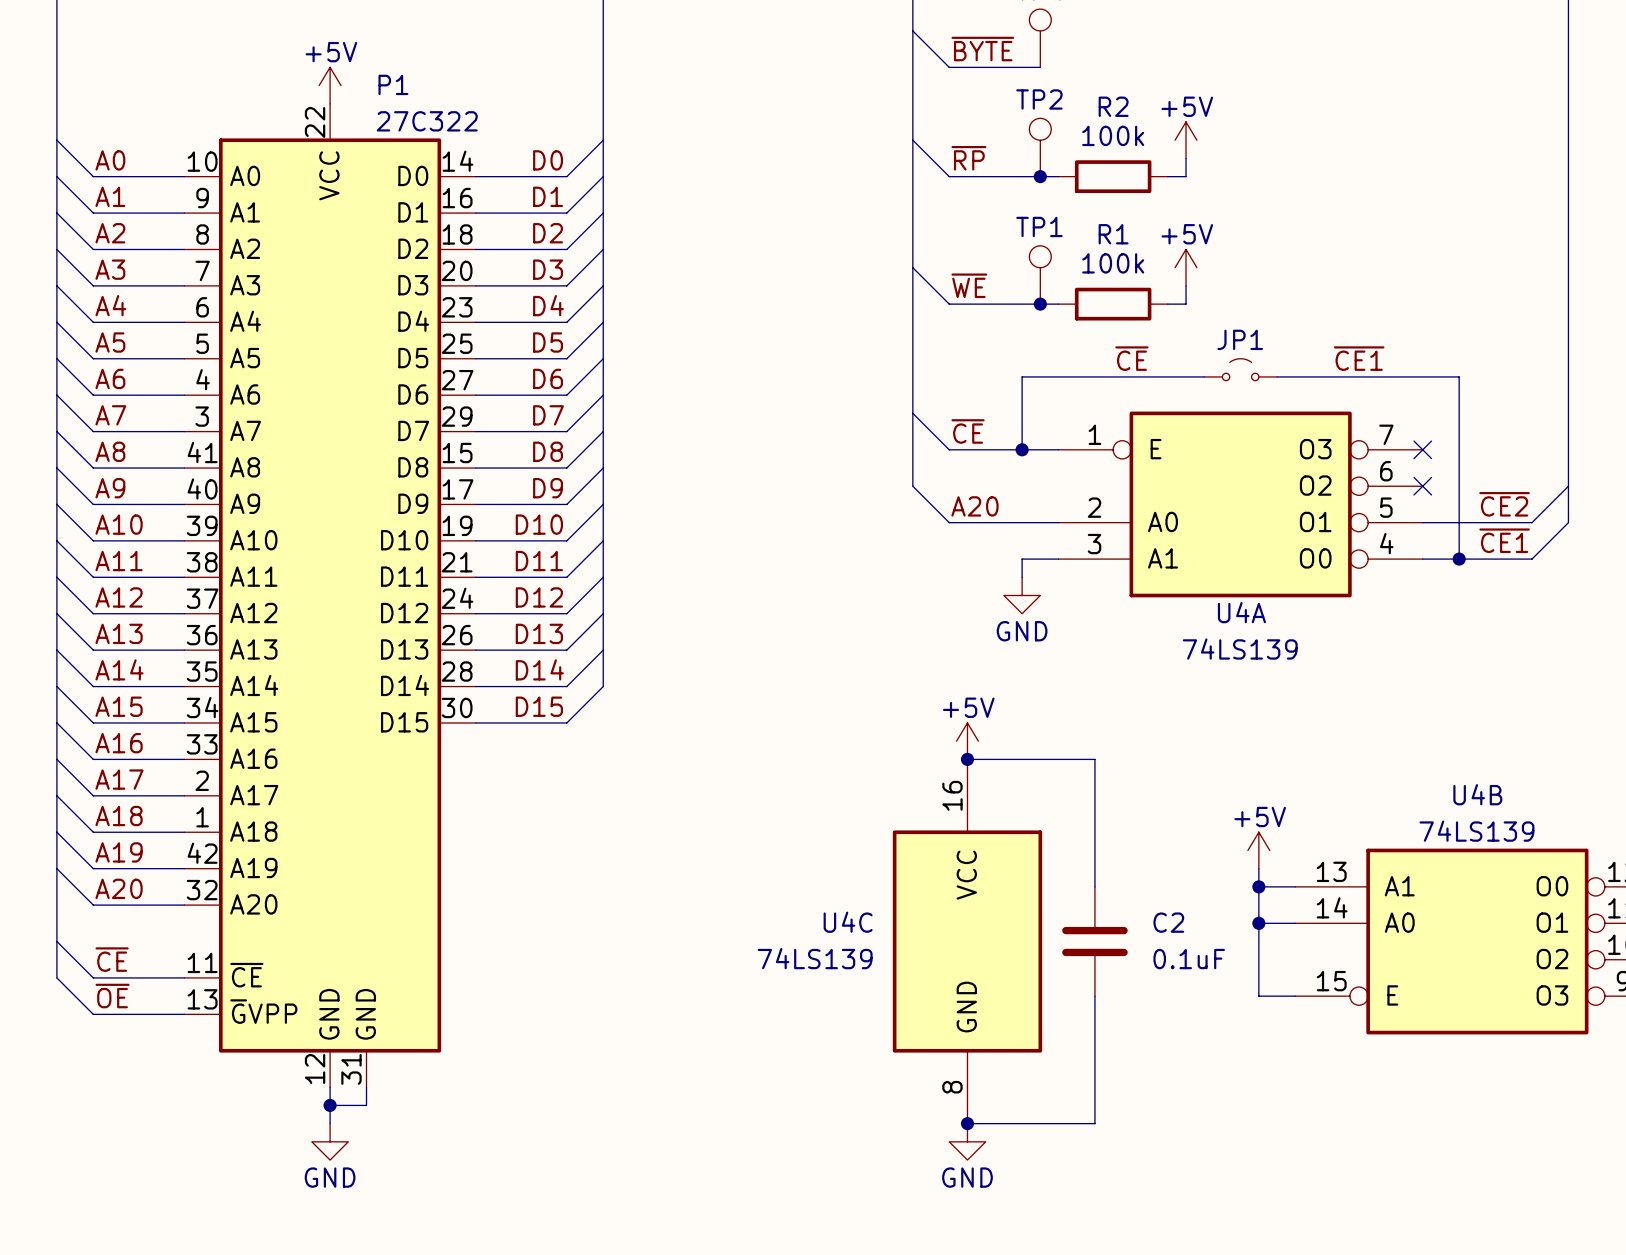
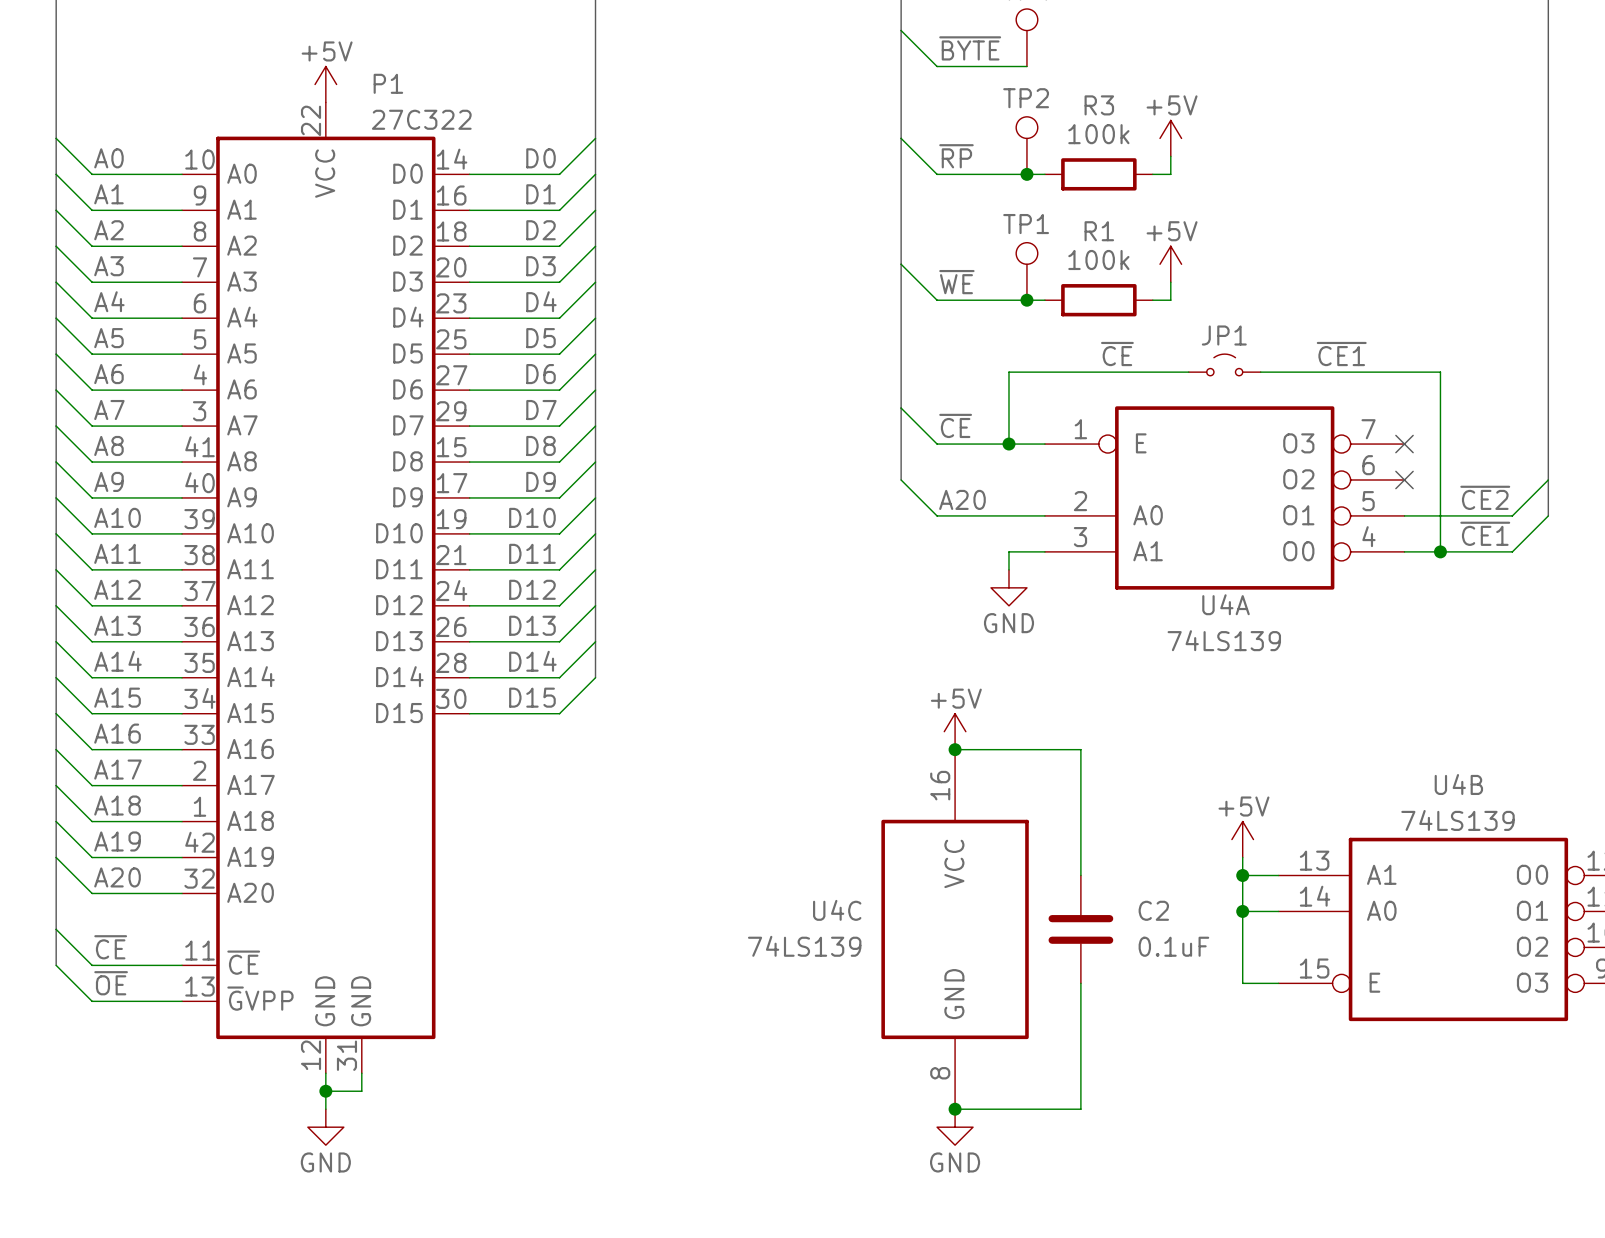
R2 name: R2 (1113, 106) -> R3 (1099, 105)

